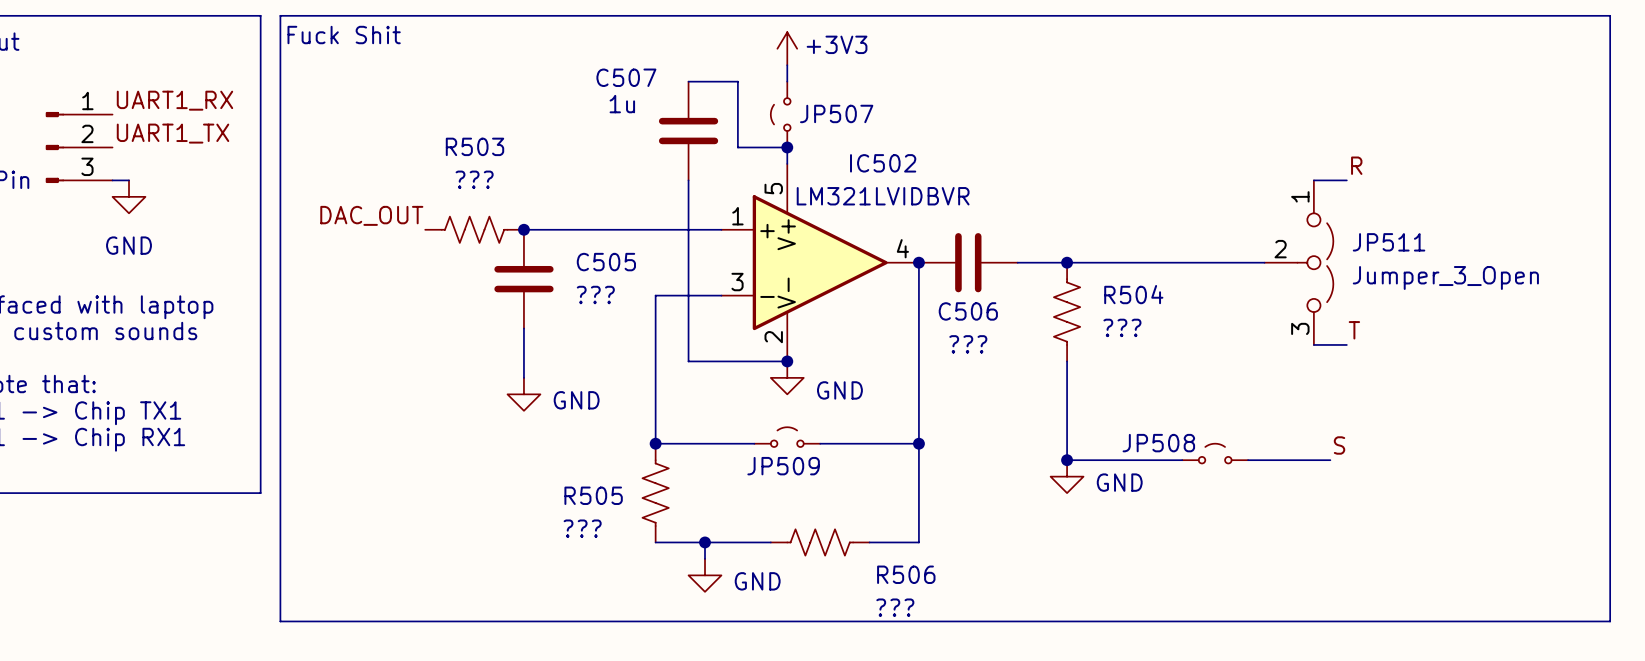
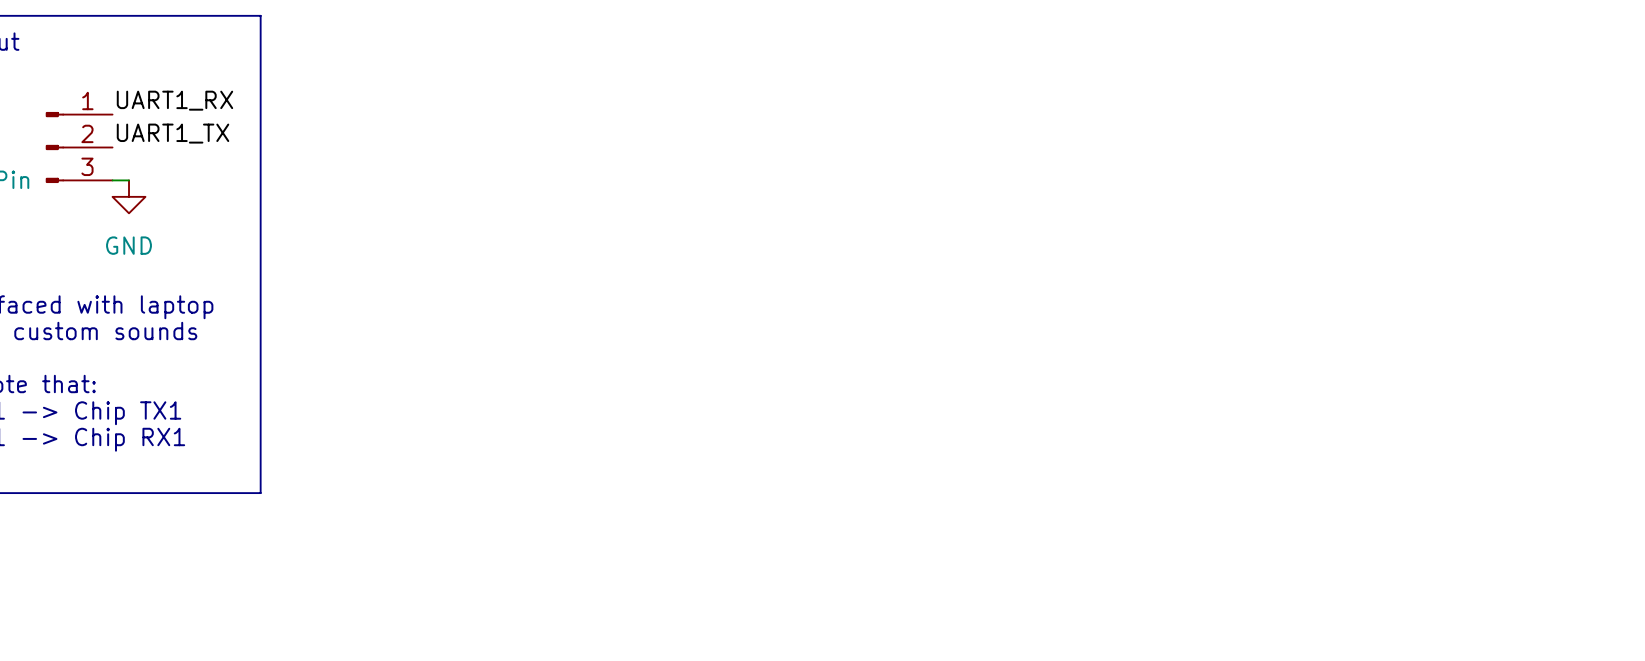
line: (280, 15) (1610, 15) (1610, 621) (280, 621) (280, 15) -> none
text: Fuck Shit (344, 35) -> none
power symbol: +3V3 (787, 48) -> none
wire: (787, 65) (787, 81) -> none
wire: (688, 81) (737, 81) (737, 147) (787, 147) (787, 163) -> none
JP507: (780, 114) -> none
C507: 1u (688, 131) -> none
junction: (787, 147) -> none
label: R (1356, 165) -> none
wire: (688, 180) (688, 361) (787, 361) -> none
wire: (1313, 180) (1346, 180) -> none
label: DAC_OUT (371, 215) -> none
R503: ??? (474, 229) -> none
wire: (523, 229) (721, 229) -> none
junction: (523, 229) -> none
IC502: LM321LVIDBVR (820, 262) -> none
wire: (918, 262) (918, 542) (869, 542) -> none
junction: (918, 262) -> none
C506: ??? (968, 262) -> none
wire: (1017, 262) (1264, 262) -> none
junction: (1067, 262) -> none
JP511: Jumper_3_Open (1298, 262) -> none
C505: ??? (523, 279) -> none
wire: (721, 295) (655, 295) (655, 443) (754, 443) -> none
R504: ??? (1067, 312) -> none
wire: (523, 328) (523, 377) -> none
label: T (1354, 330) -> none
wire: (1313, 344) (1346, 344) -> none
junction: (787, 361) -> none
wire: (1067, 361) (1067, 460) (1182, 460) -> none
power symbol: GND (787, 377) -> none
power symbol: GND (523, 394) -> none
JP509: (787, 437) -> none
junction: (655, 443) -> none
wire: (820, 443) (918, 443) -> none
junction: (918, 443) -> none
label: S (1339, 445) -> none
JP508: (1215, 453) -> none
junction: (1067, 460) -> none
wire: (1248, 460) (1330, 460) -> none
power symbol: GND (1067, 476) -> none
R505: ??? (655, 493) -> none
wire: (655, 542) (770, 542) -> none
wire: (705, 542) (705, 558) -> none
junction: (705, 542) -> none
R506: ??? (820, 542) -> none
power symbol: GND (705, 575) -> none

